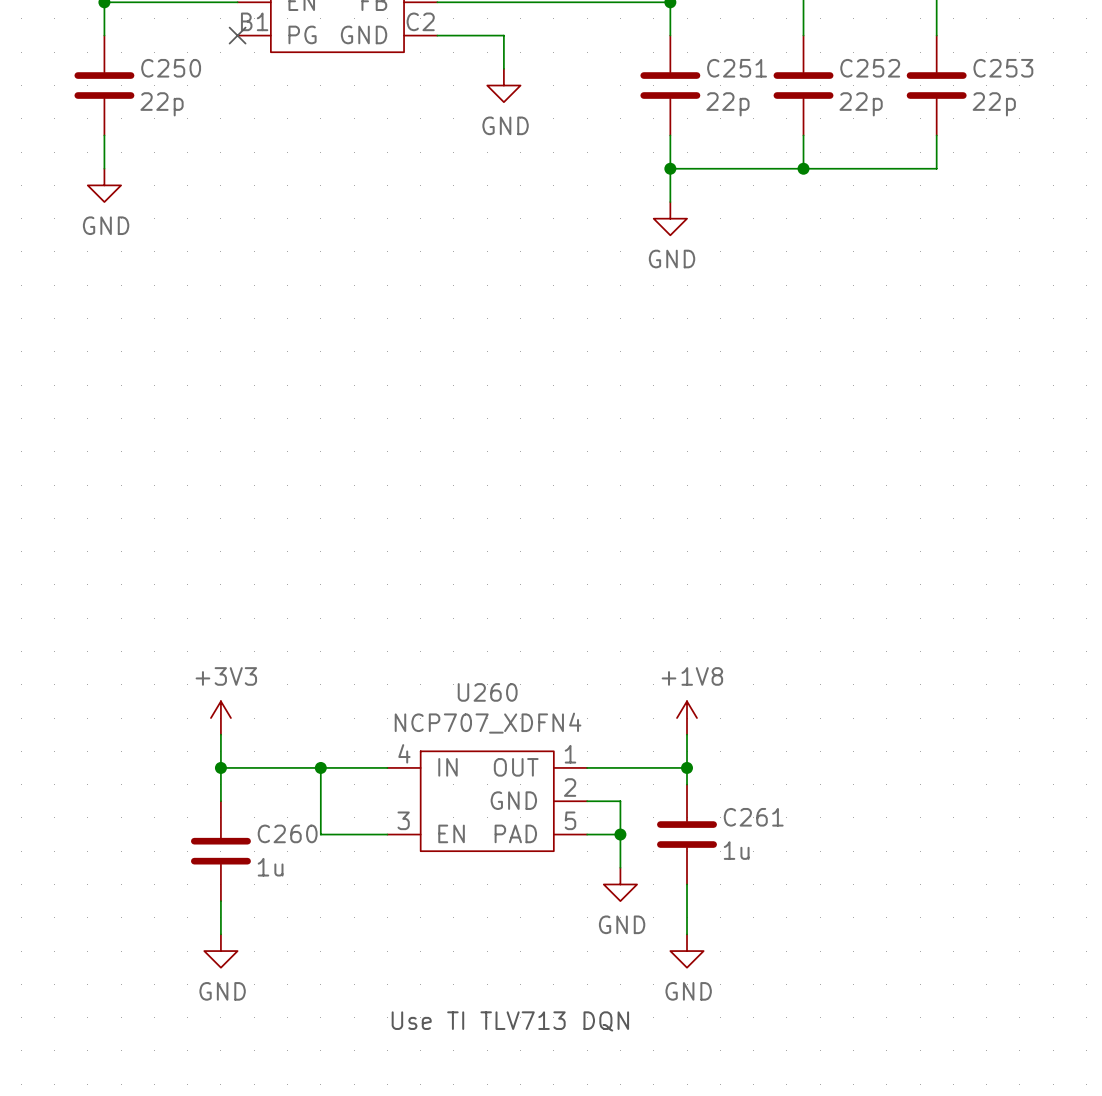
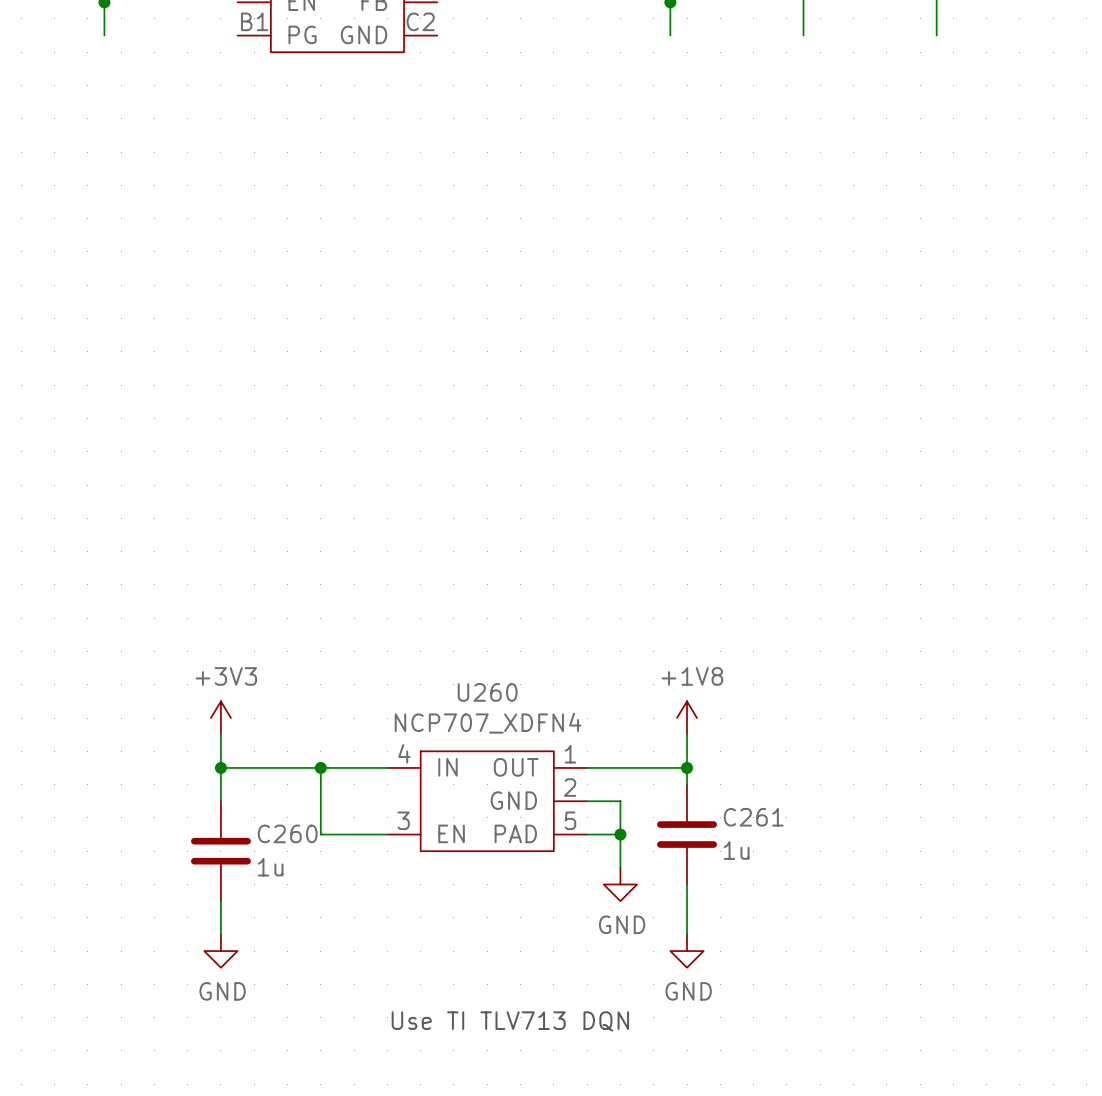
wire: (104, 2) (237, 2) -> none
wire: (437, 2) (670, 2) -> none
no-connect mark: (237, 35) -> none
wire: (437, 35) (503, 35) (503, 68) -> none
C250: 22p (104, 85) -> none
power symbol: GND (503, 85) -> none
C251: 22p (670, 85) -> none
C252: 22p (803, 85) -> none
C253: 22p (936, 85) -> none
wire: (104, 135) (104, 168) -> none
wire: (670, 135) (670, 202) -> none
wire: (803, 135) (803, 168) -> none
wire: (936, 135) (936, 168) (670, 168) -> none
junction: (670, 168) -> none
junction: (803, 168) -> none
power symbol: GND (104, 185) -> none
power symbol: GND (670, 218) -> none

